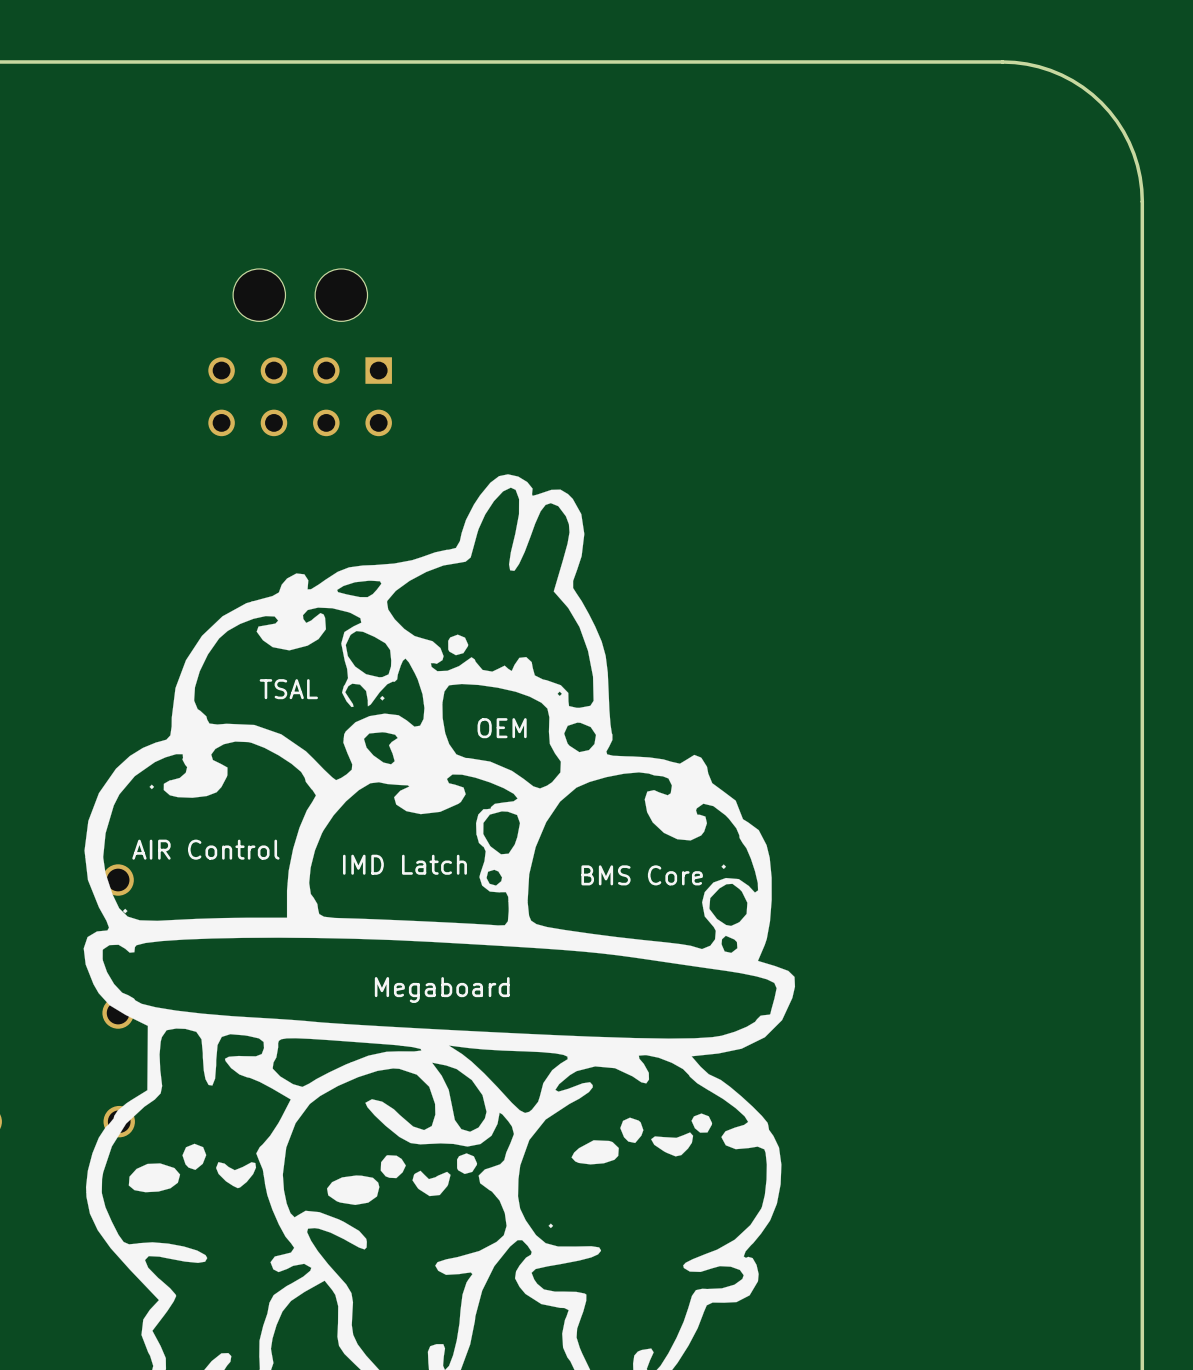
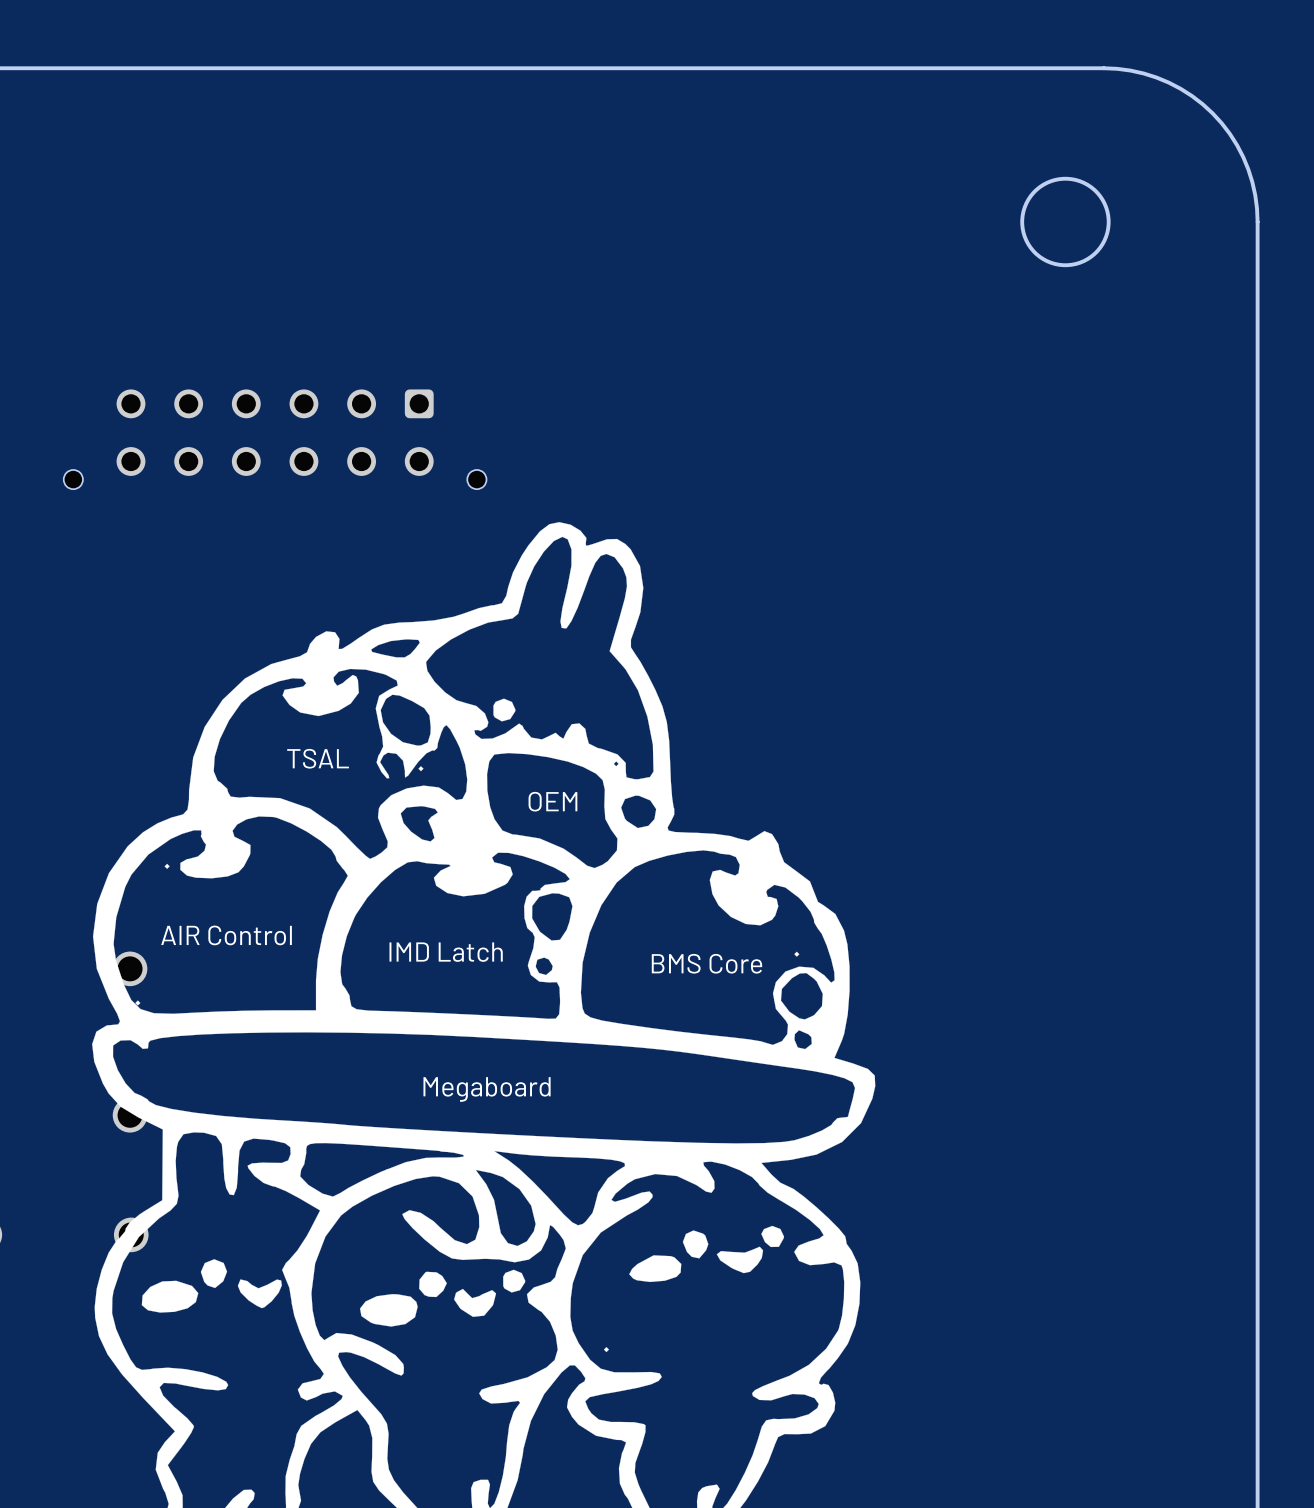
round board edge: none -> [1020, 176, 1111, 268]
part: (300, 352) -> none
part: none -> (275, 439)

